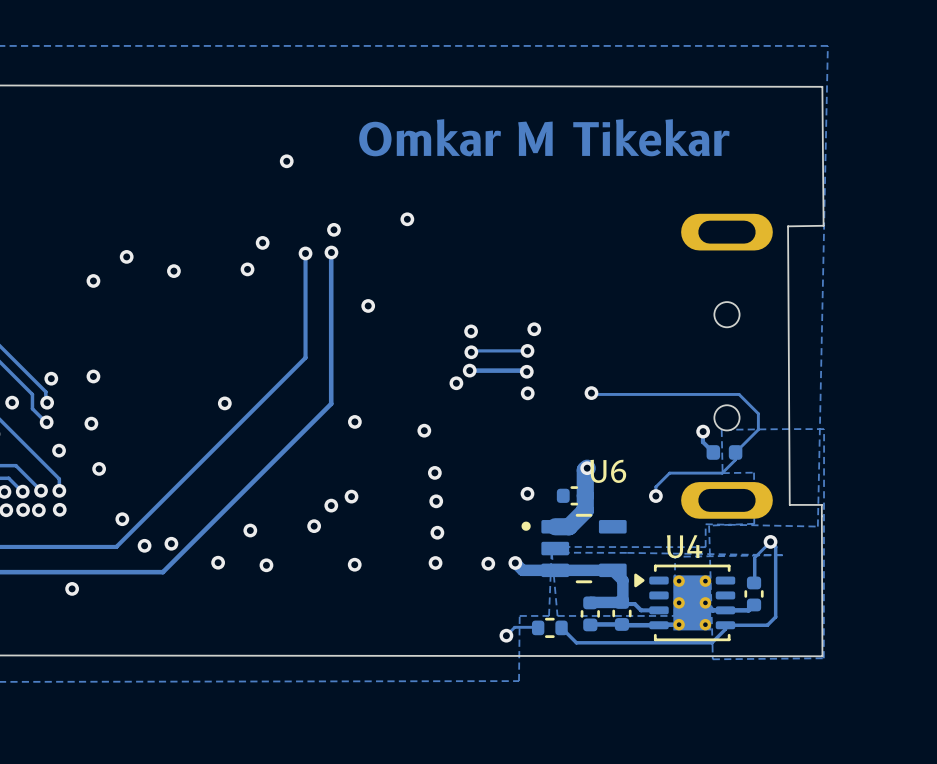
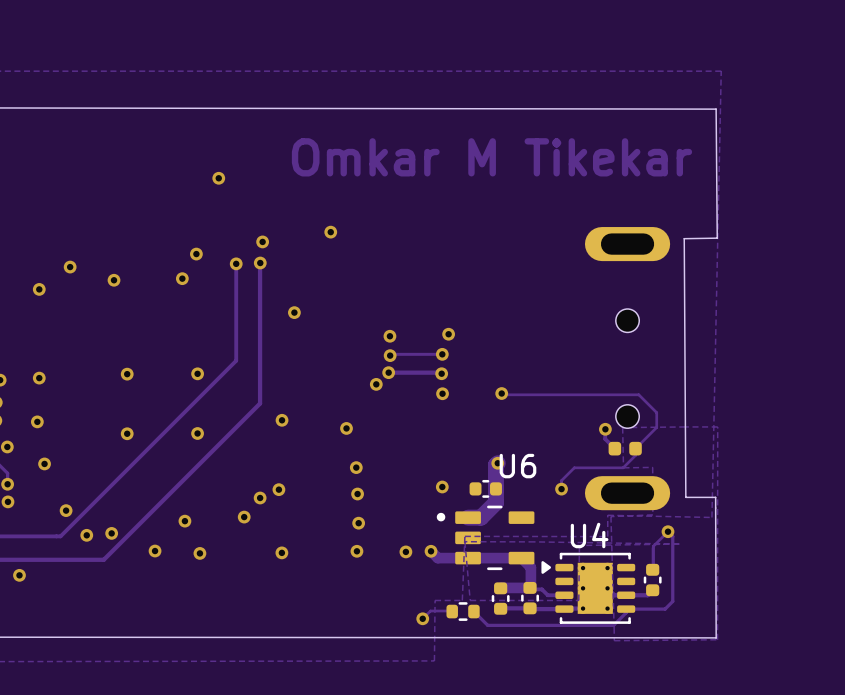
via: none -> (197, 373)
via: none -> (127, 374)
via: (224, 403) -> none
via: none -> (127, 433)
via: none -> (197, 433)

